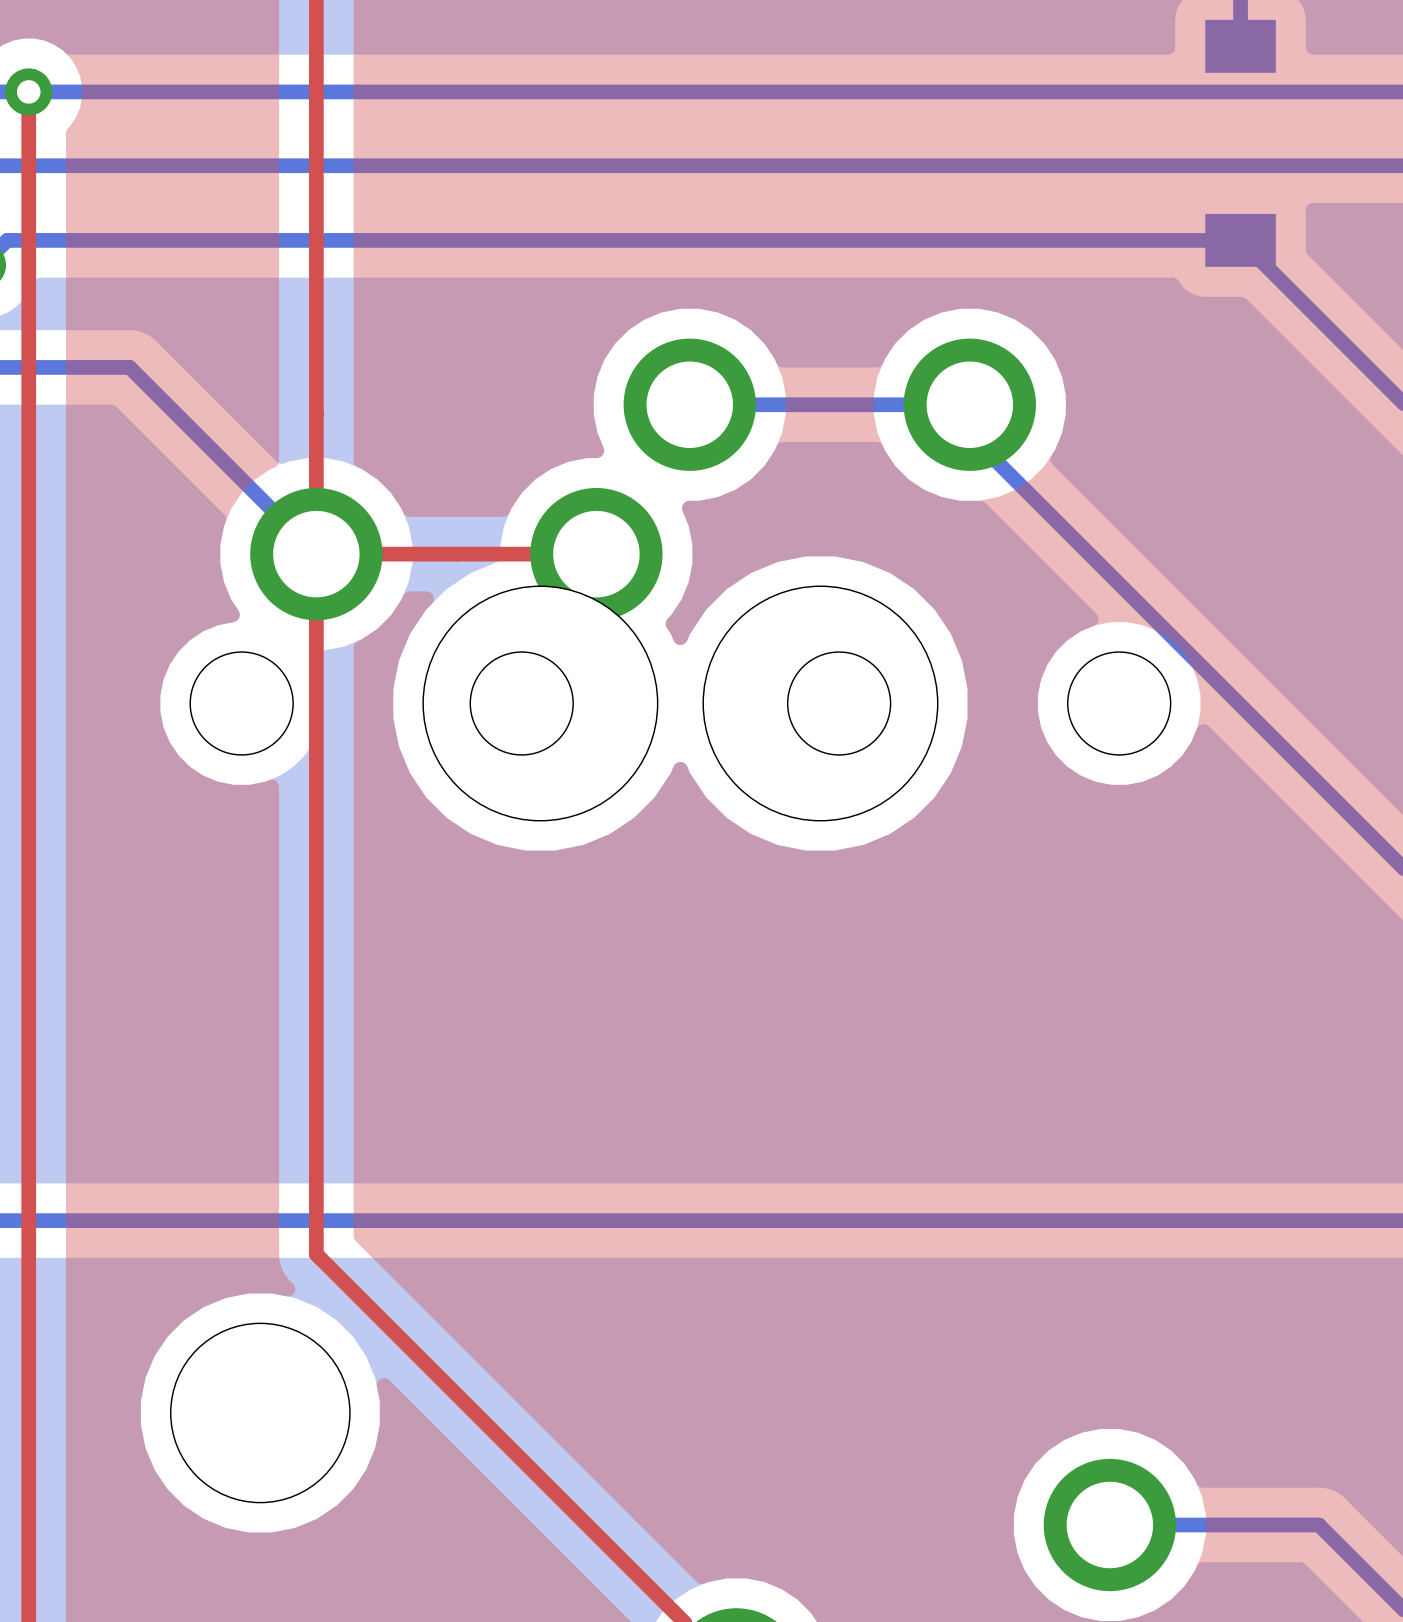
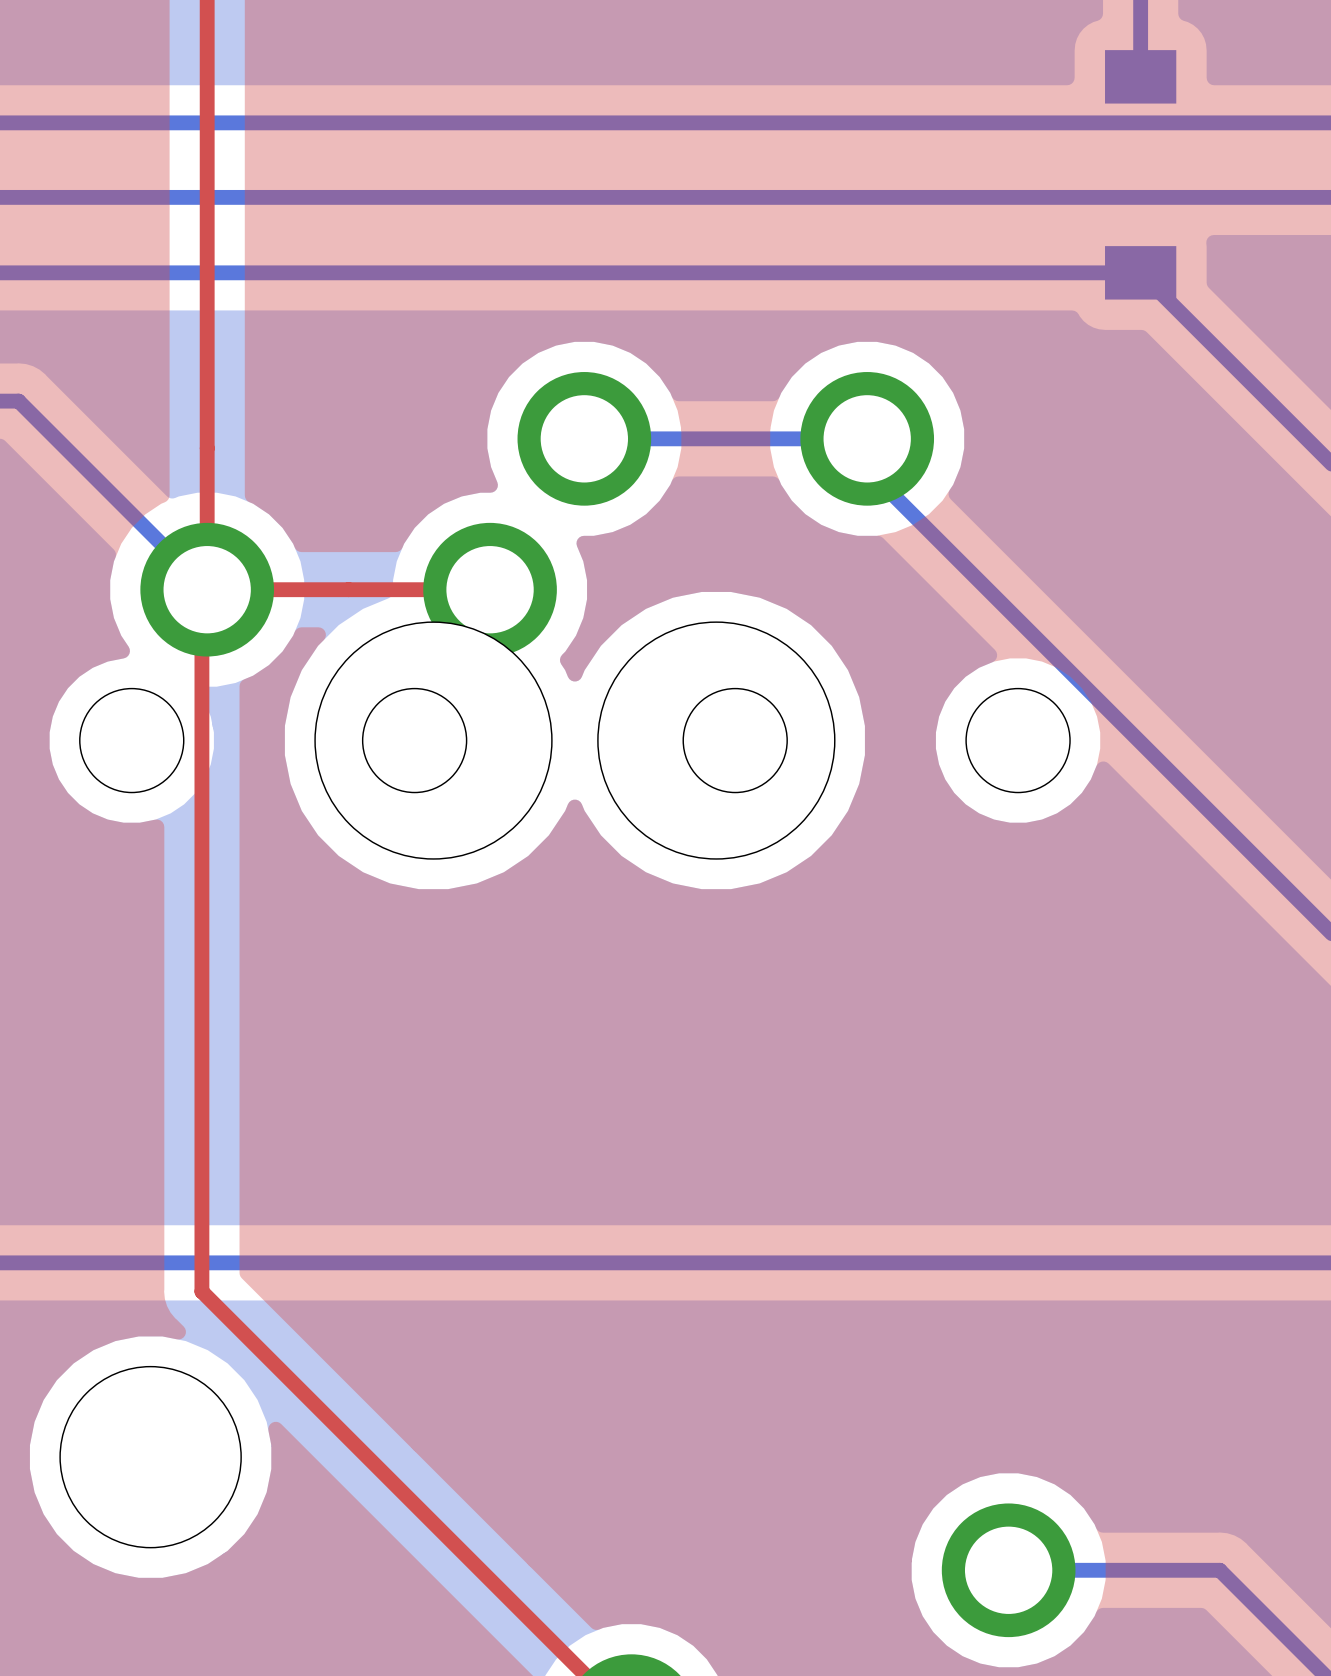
top track: (316, 554) (316, 1254) -> (201, 641) (201, 1291) (207, 1296)

